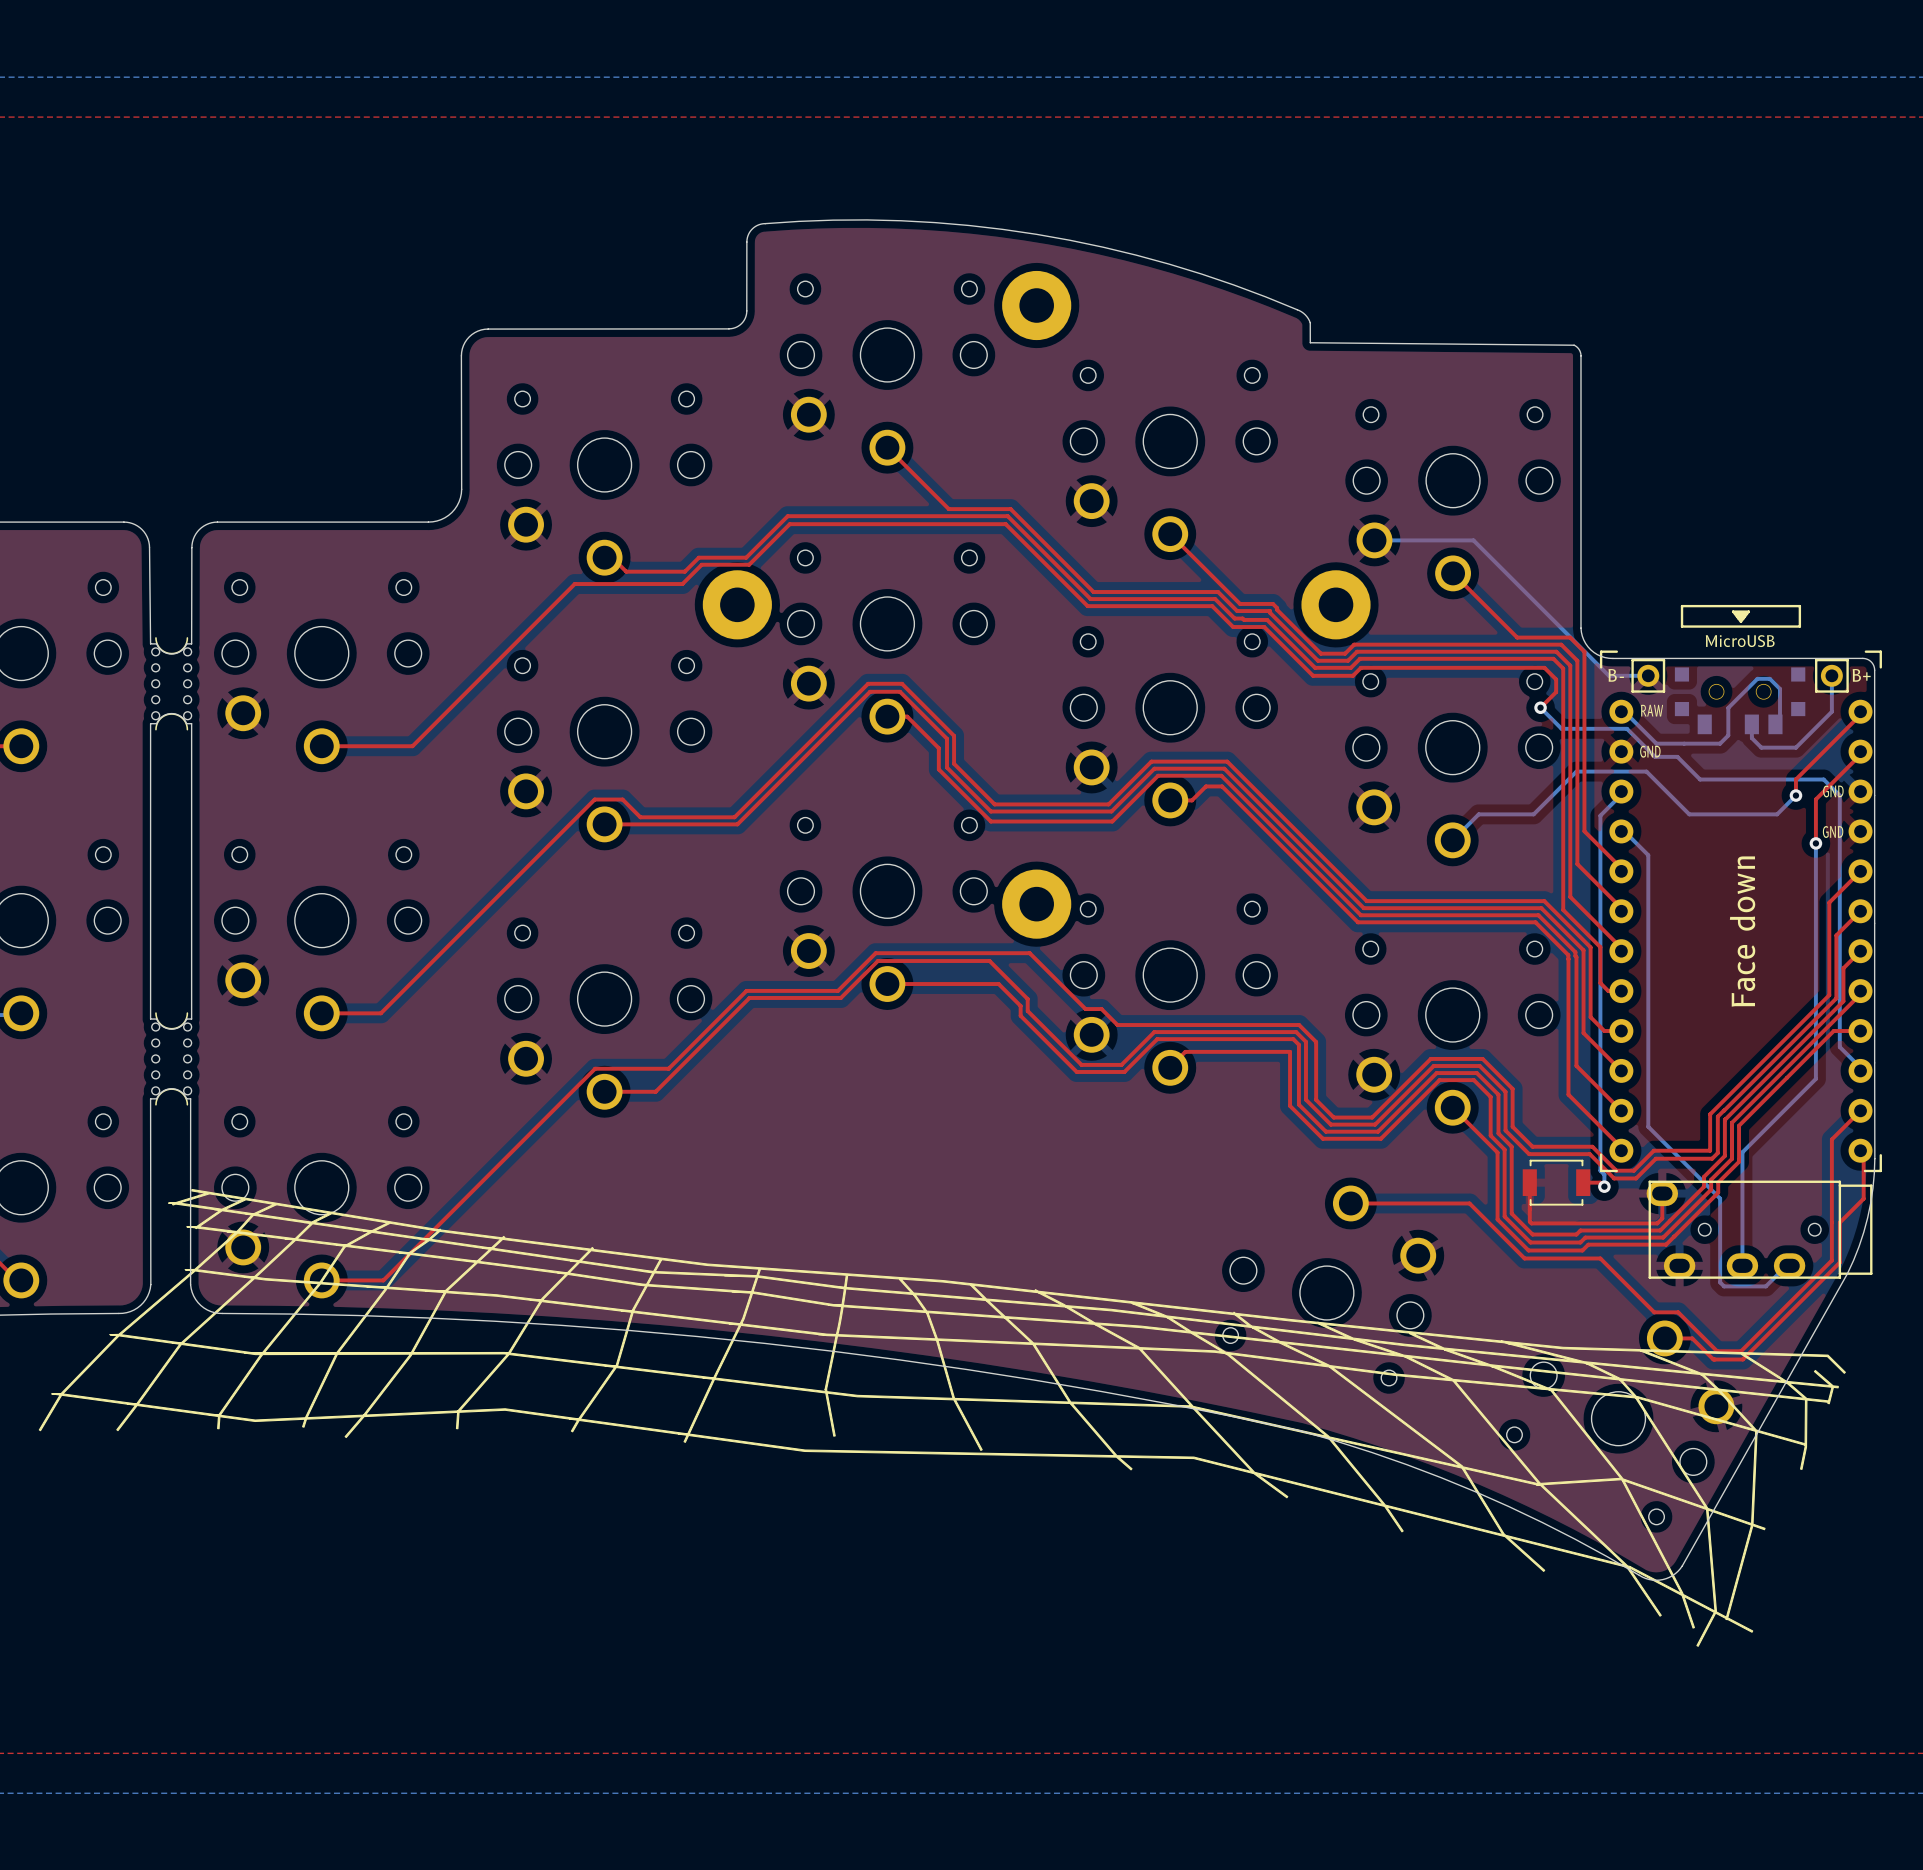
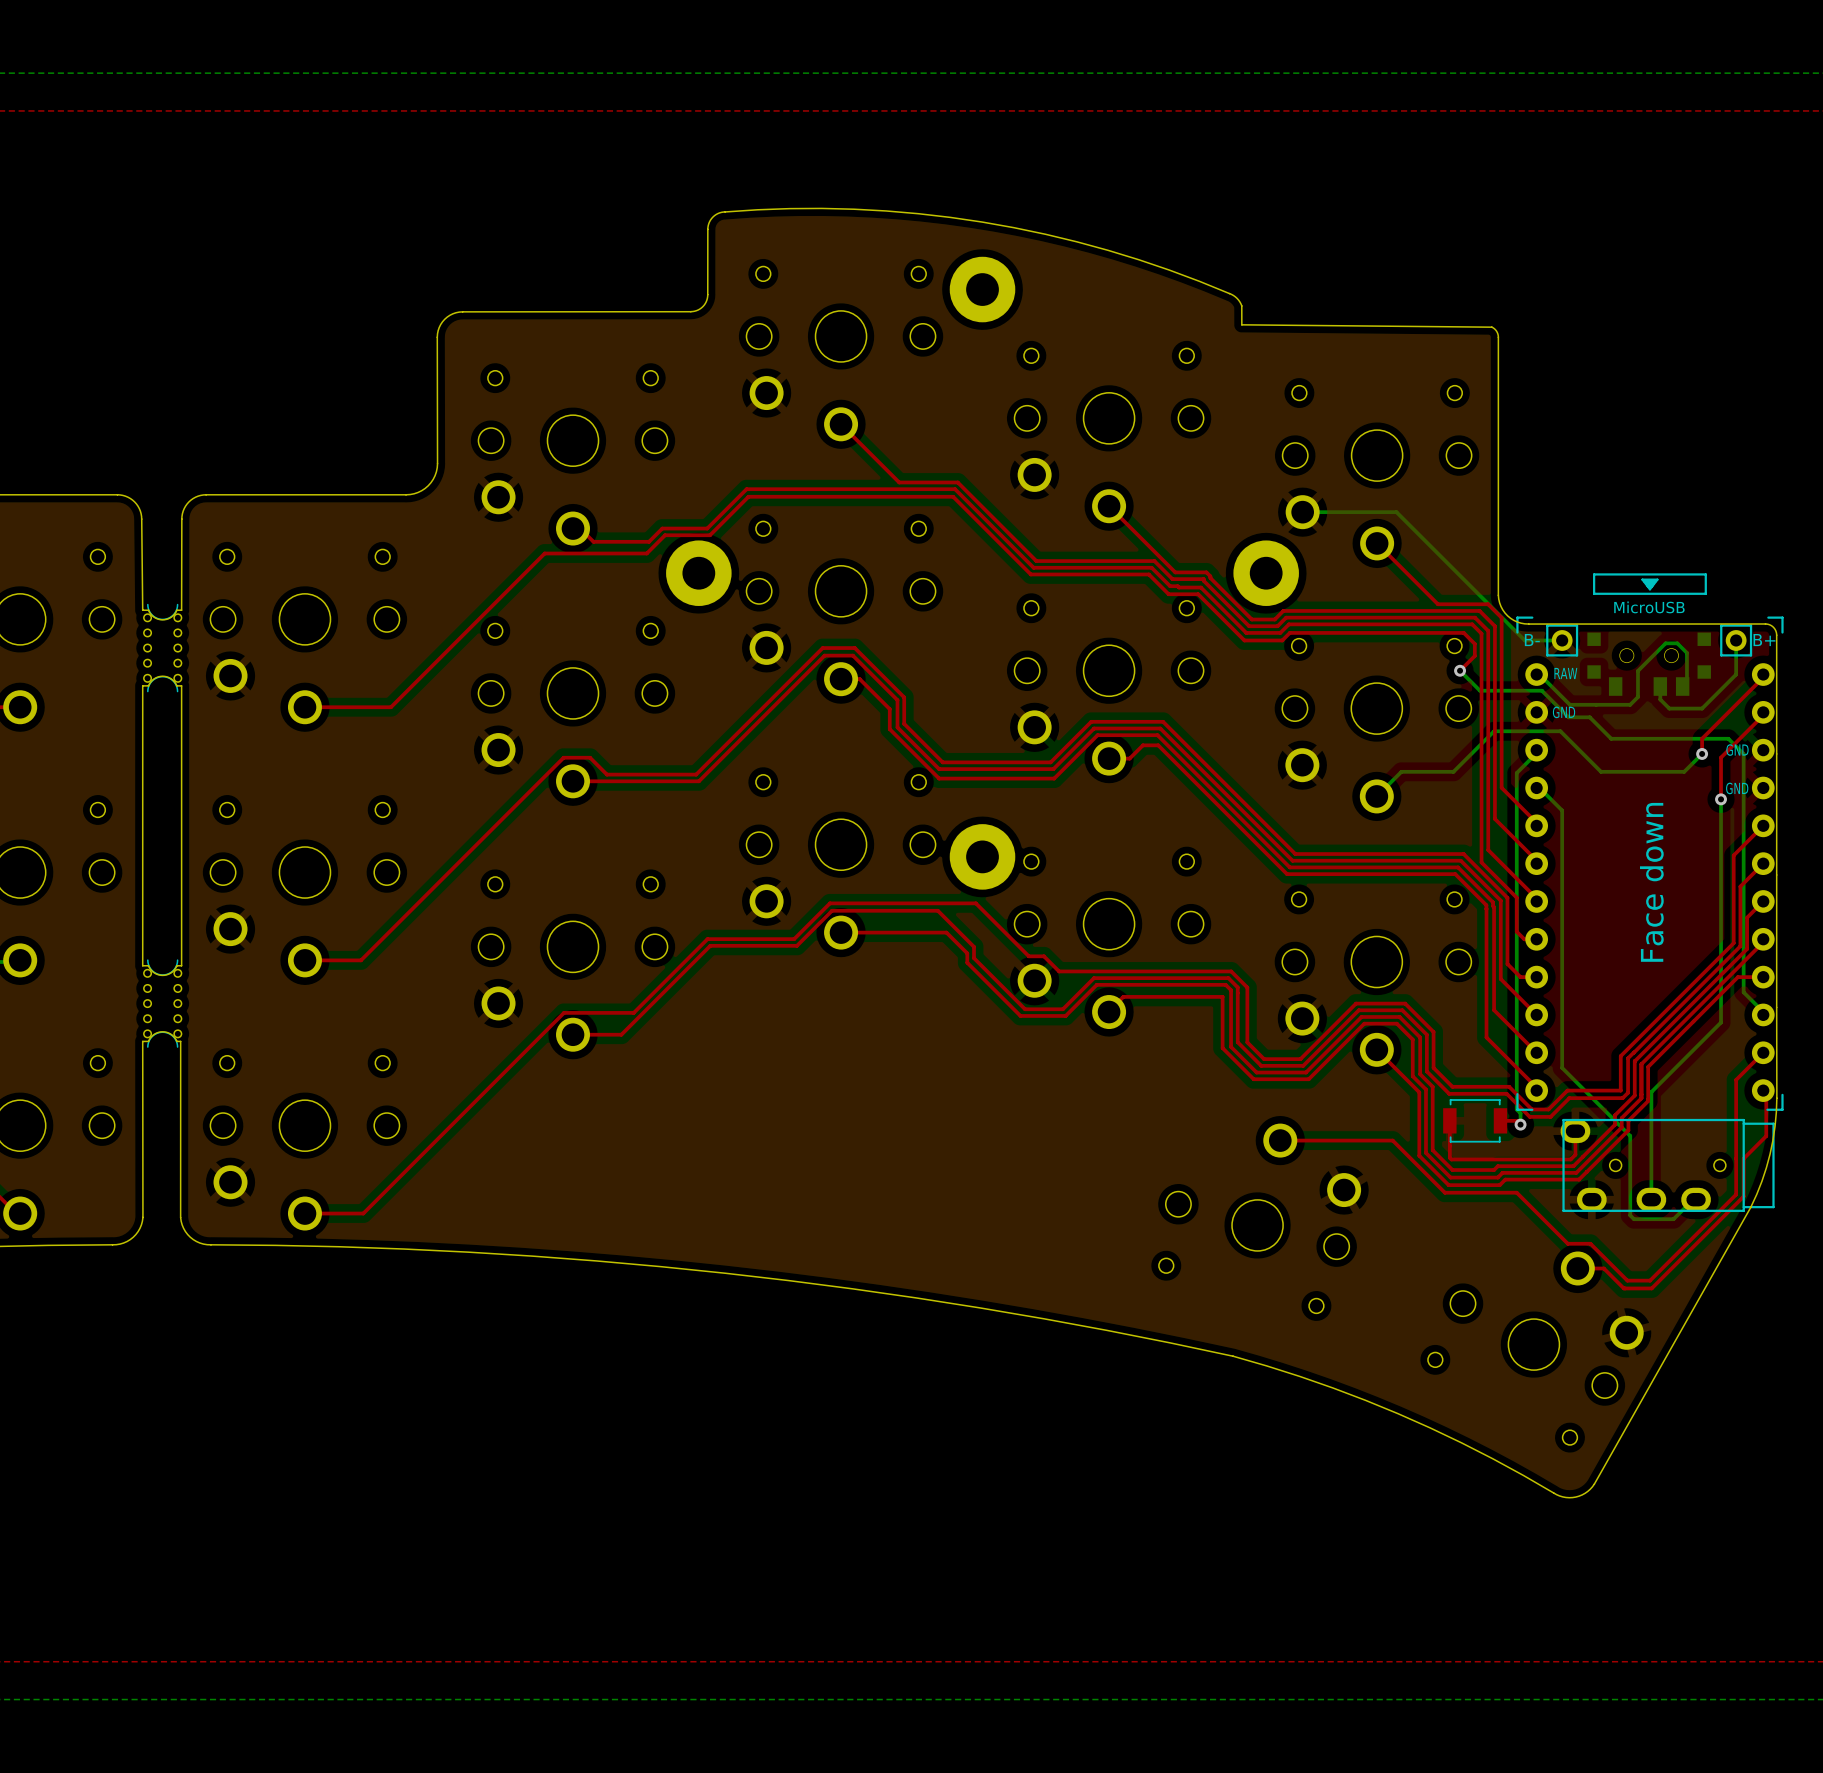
drawing: [38, 1188, 1846, 1647] -> none

